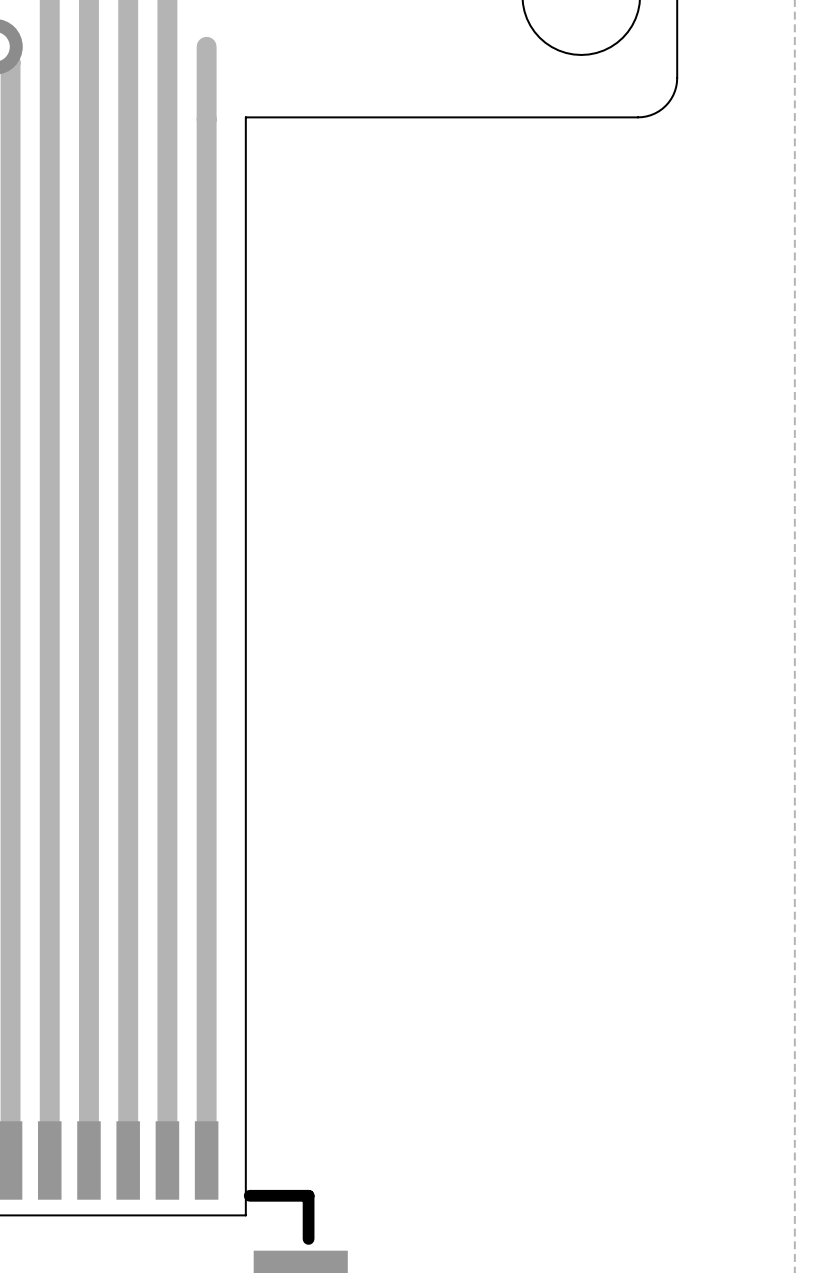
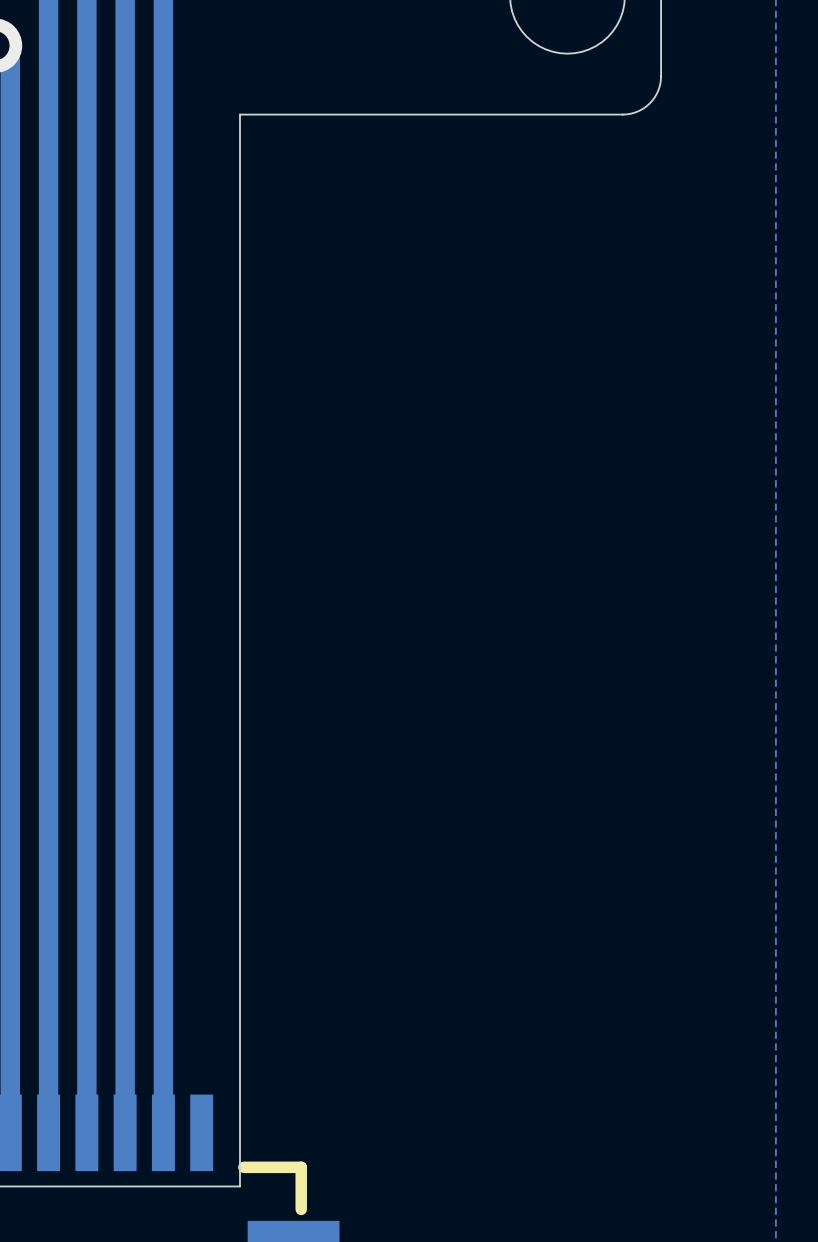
track: (206, 46) (206, 1160) -> none

